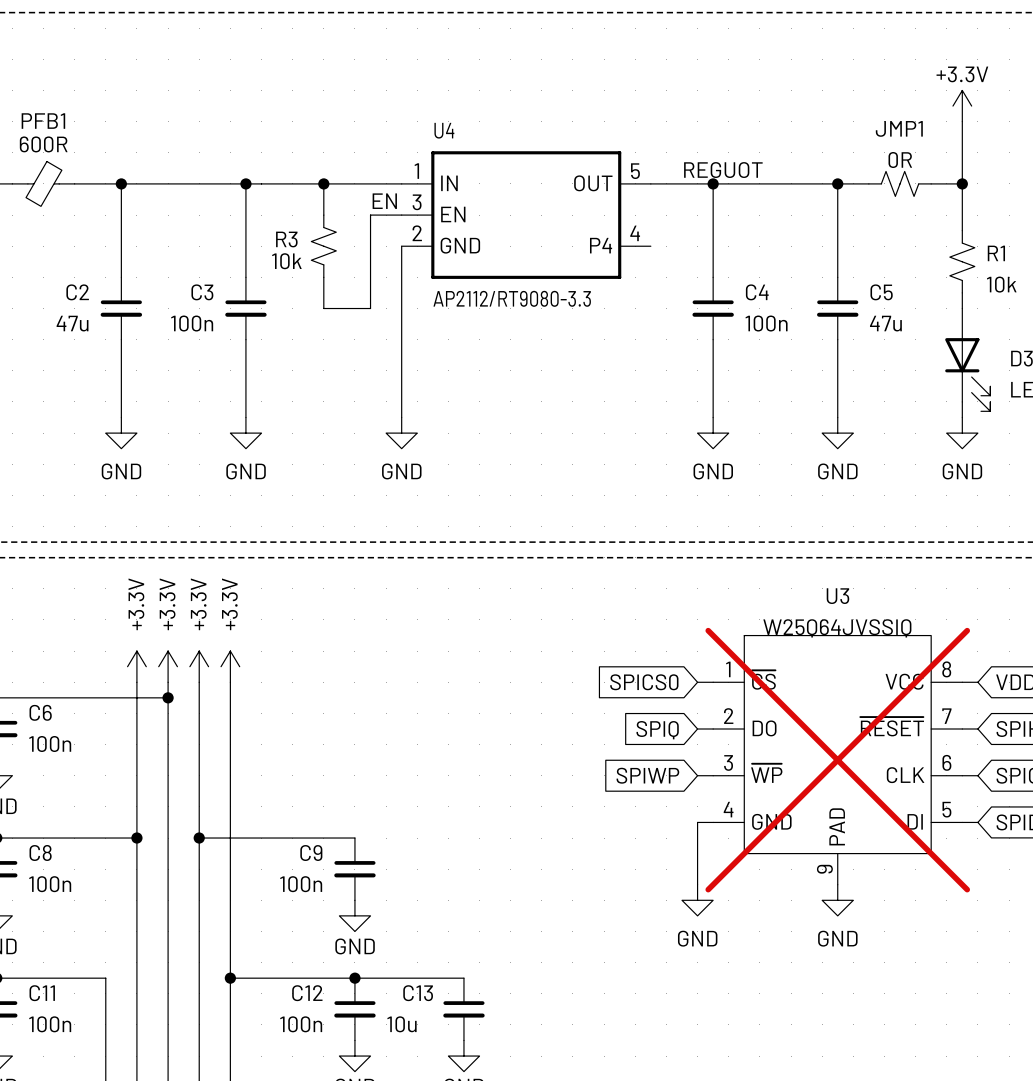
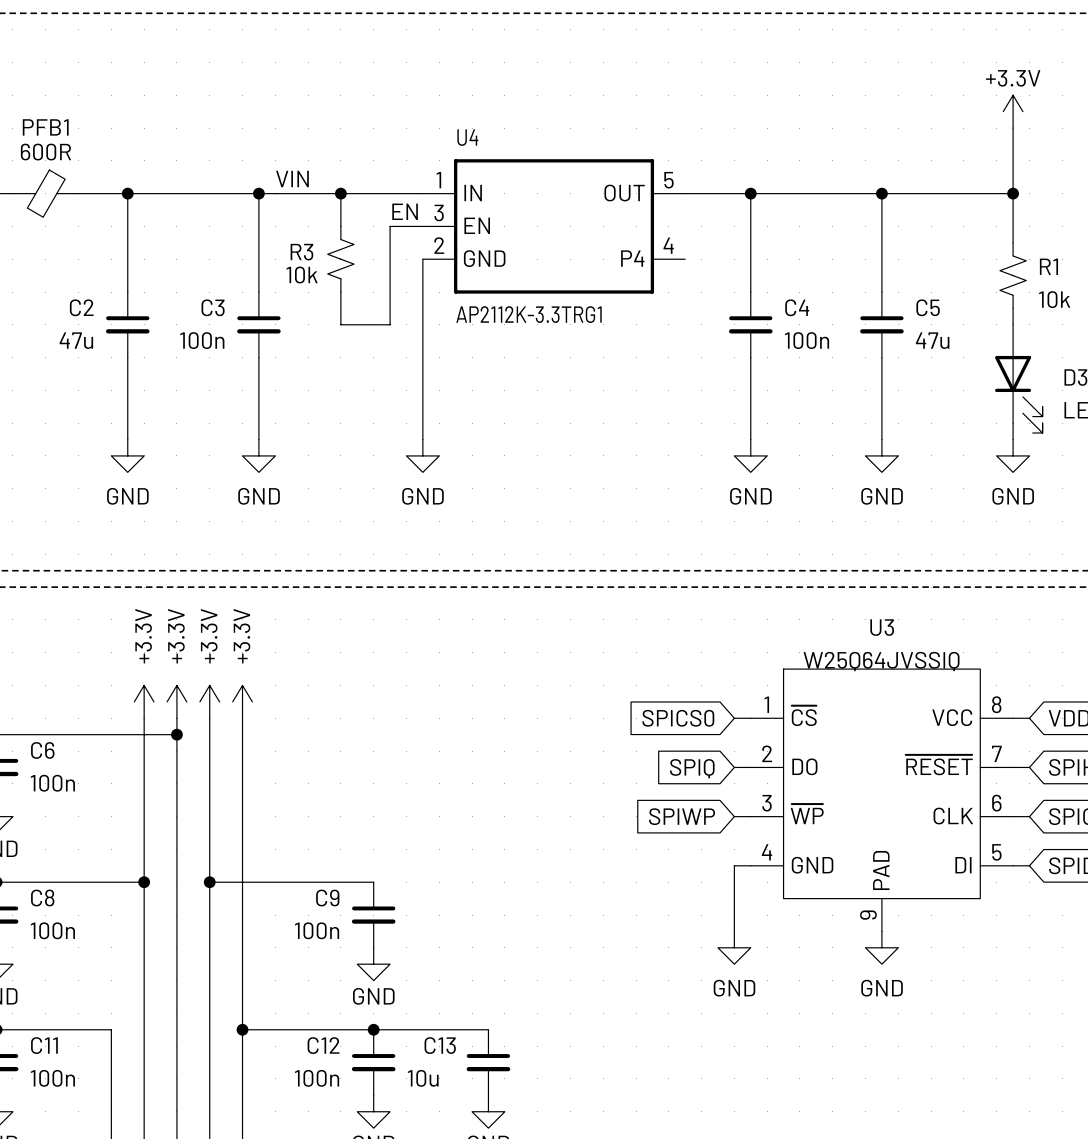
label: none -> VIN (292, 179)
label: REGUOT (723, 170) -> none
wire: none -> (914, 193) (980, 193)
JMP1: 0R (900, 183) -> none
U4 value: AP2112/RT9080-3.3 (512, 298) -> AP2112K-3.3TRG1 (529, 314)
U3 do-not-place cross: (837, 760) -> none

